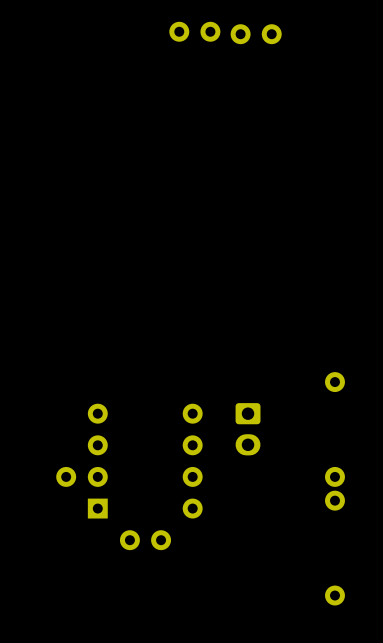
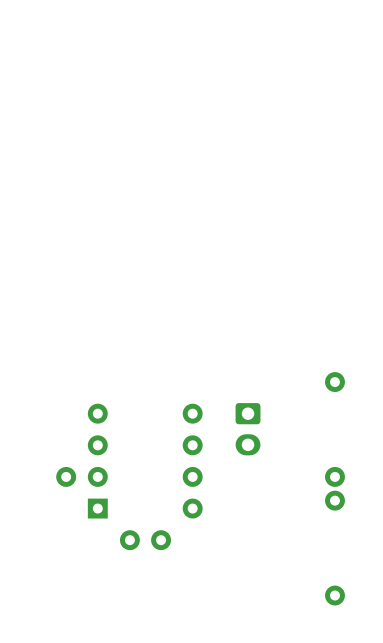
part: (194, 31) -> none
part: (256, 34) -> none

